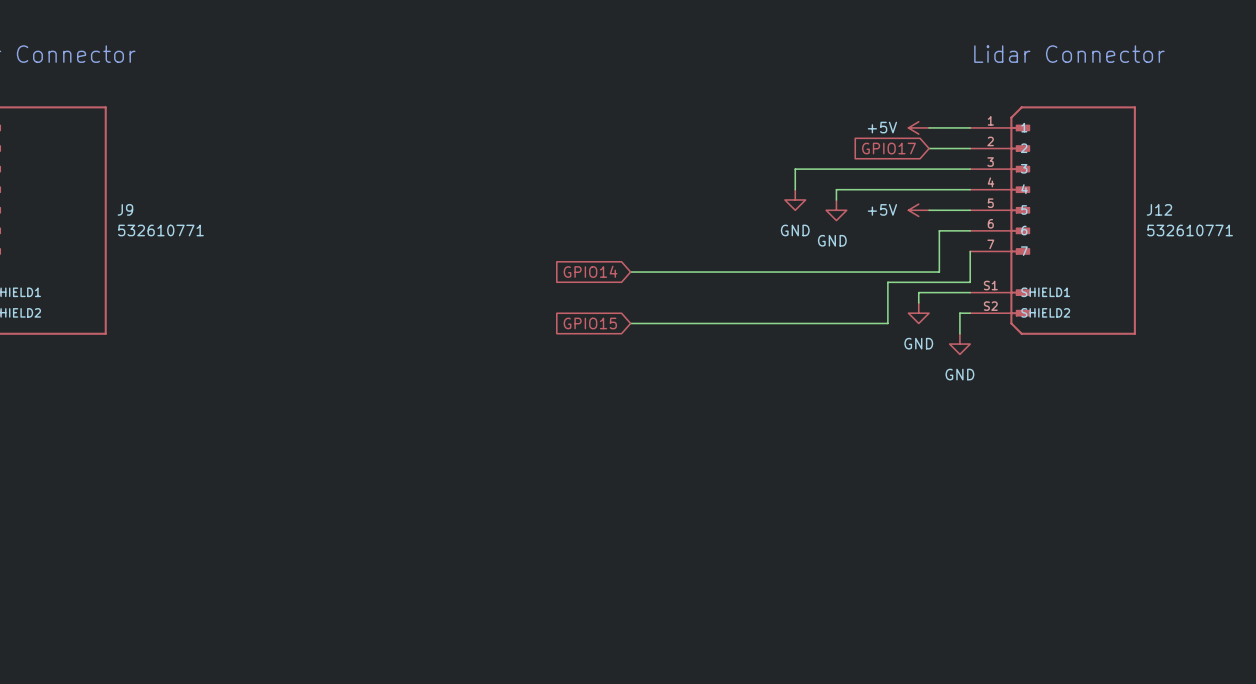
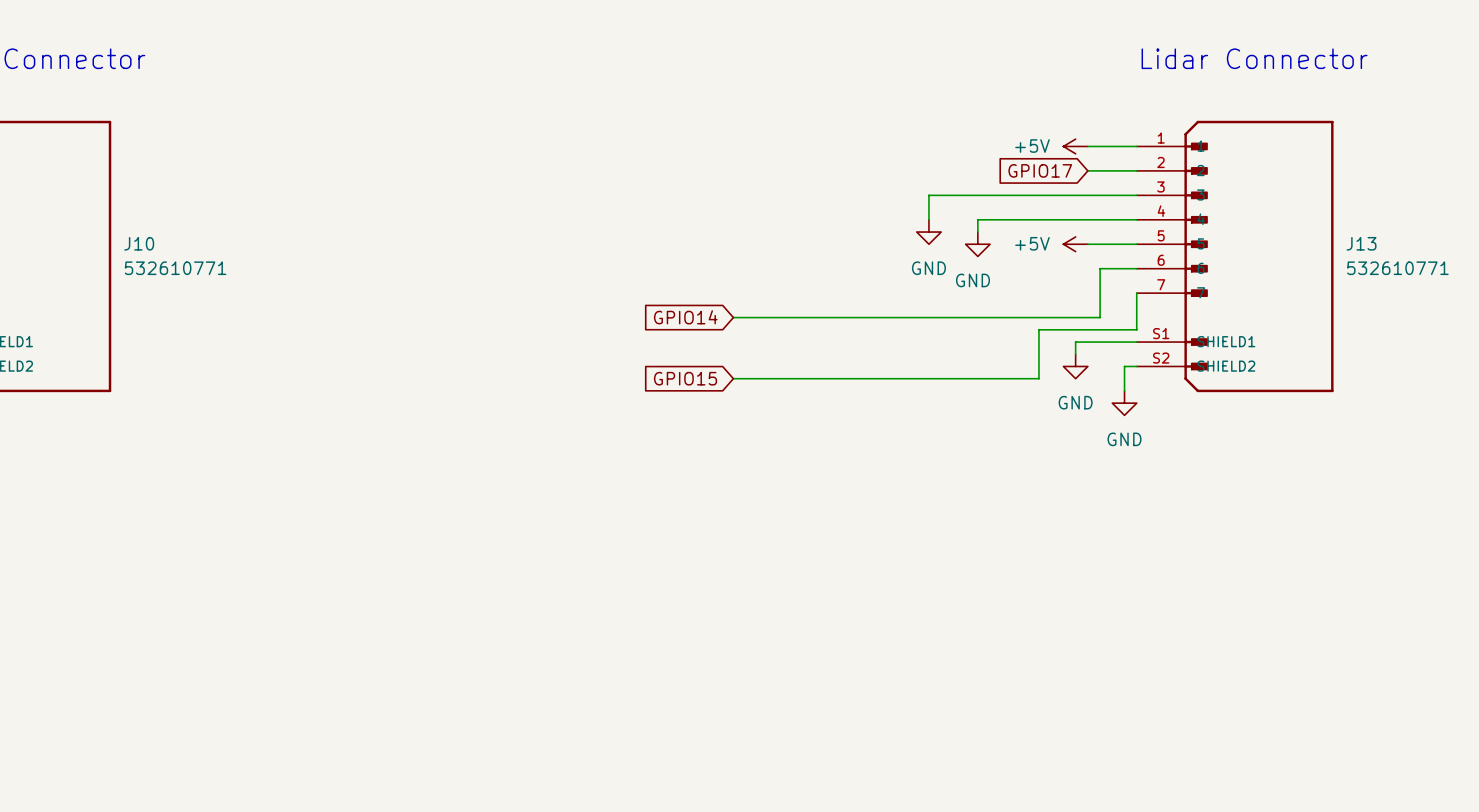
J9 name: J9 (125, 209) -> J10 (139, 243)
J12 name: J12 (1159, 209) -> J13 (1361, 243)

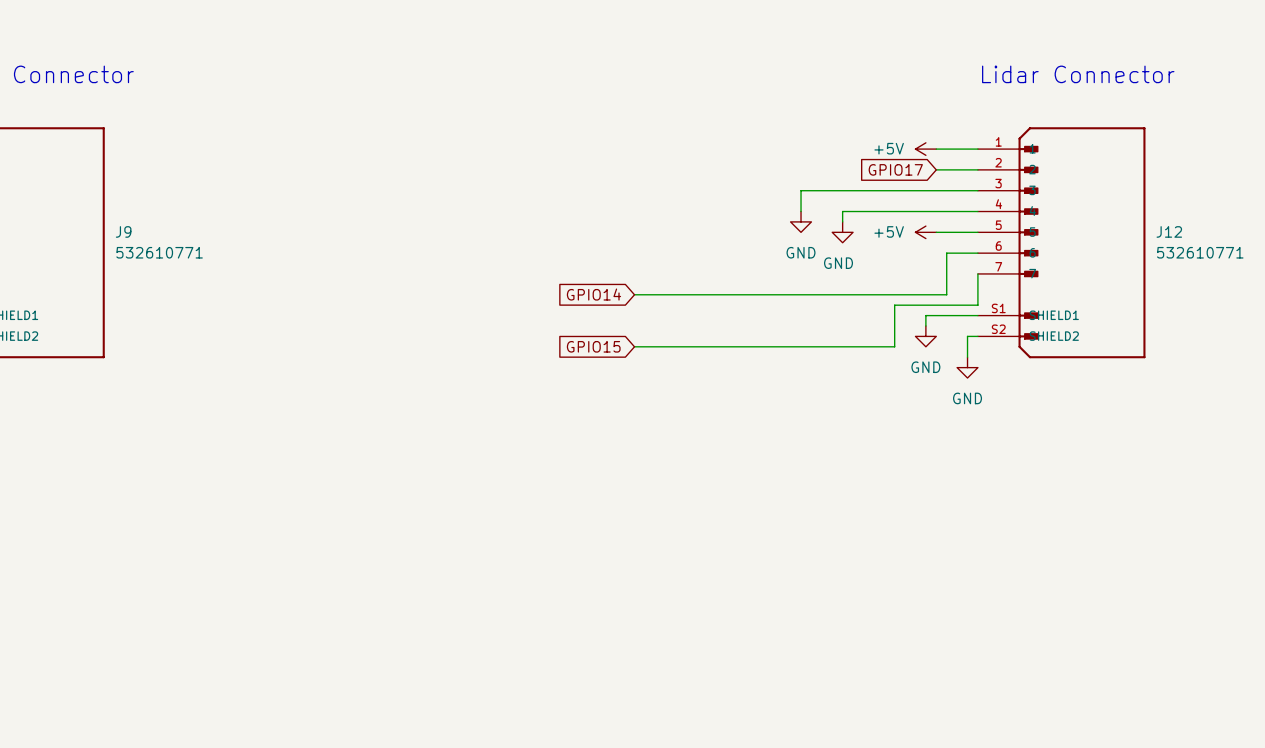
J10 name: J10 (139, 243) -> J9 (123, 231)
J13 name: J13 (1361, 243) -> J12 (1169, 231)

